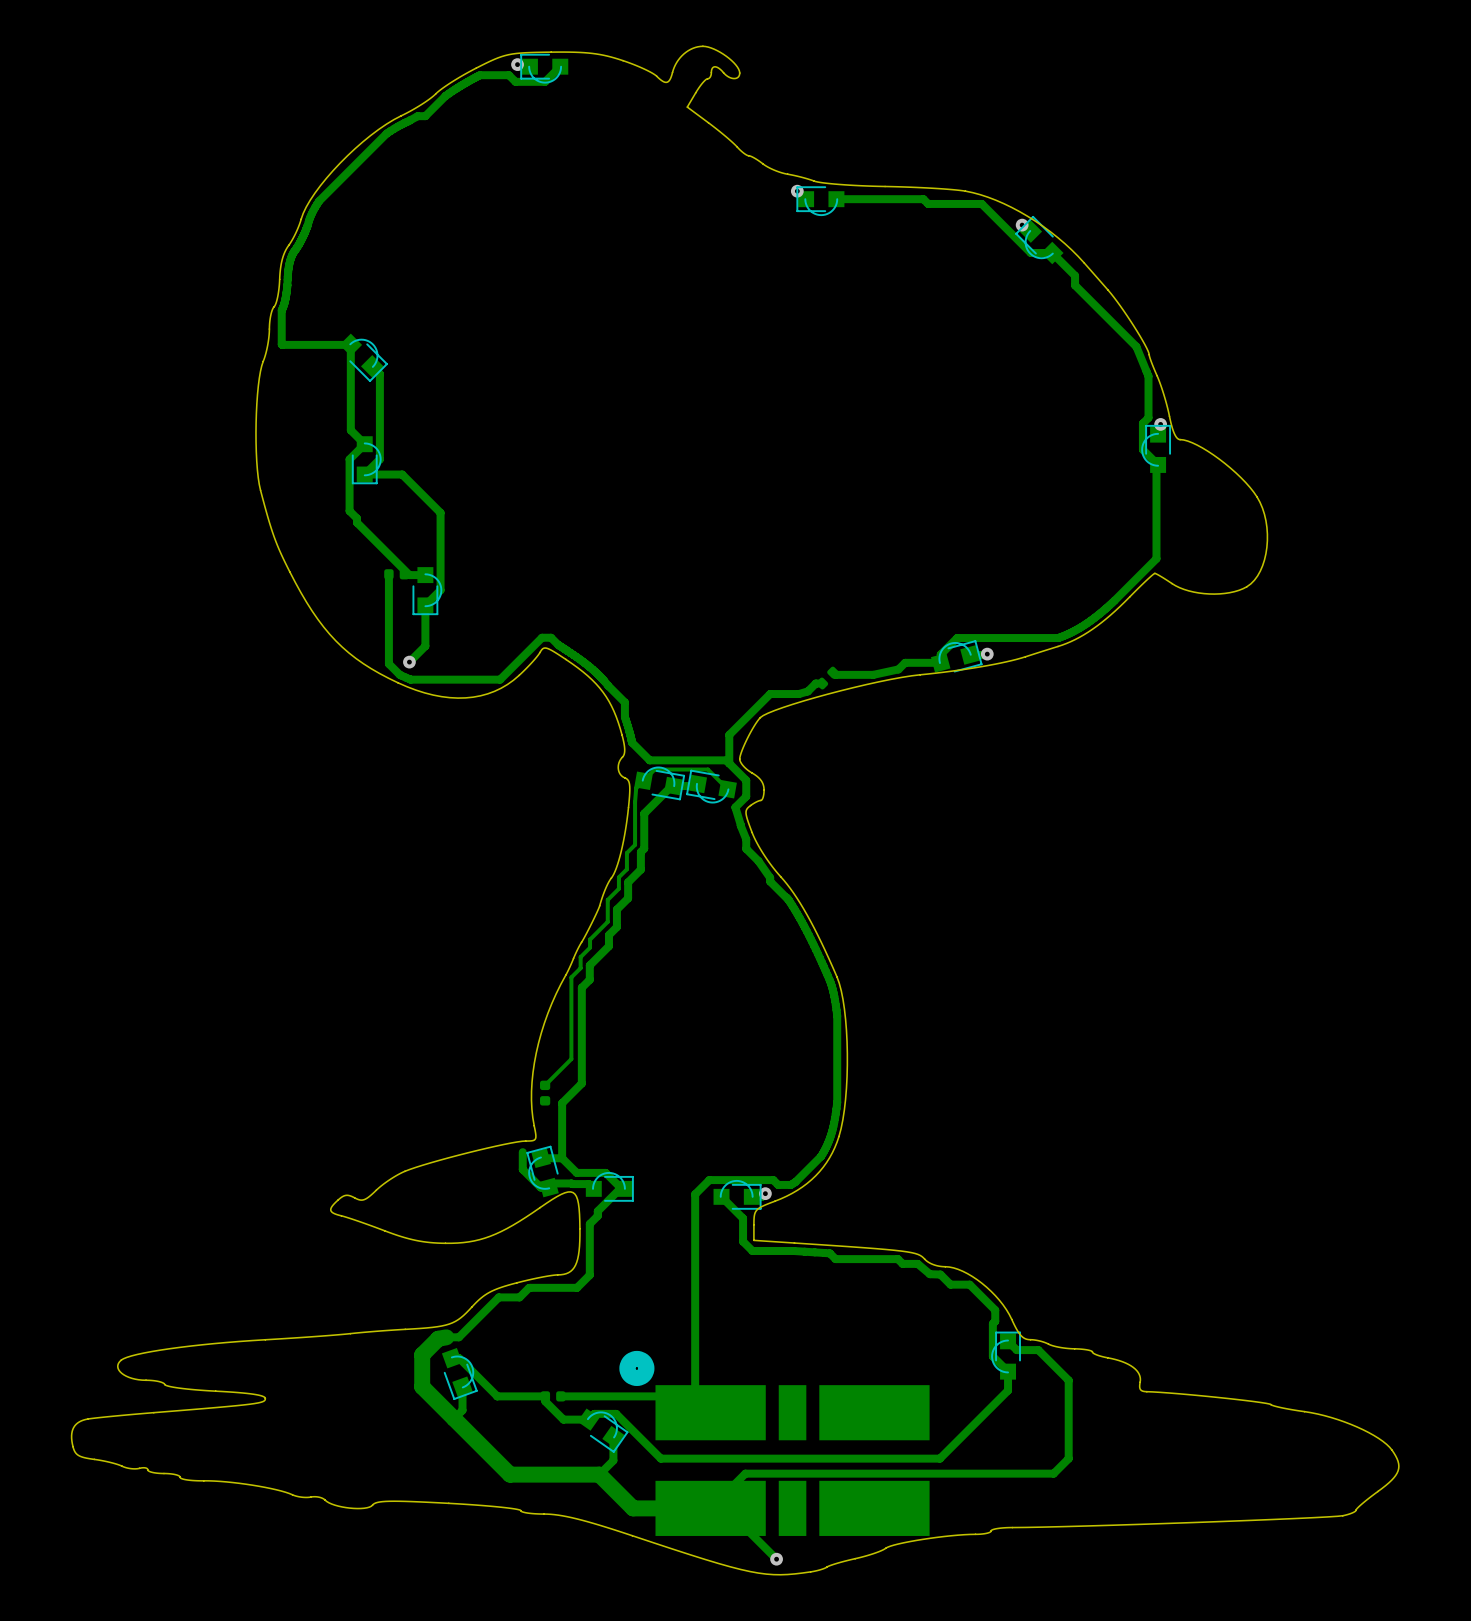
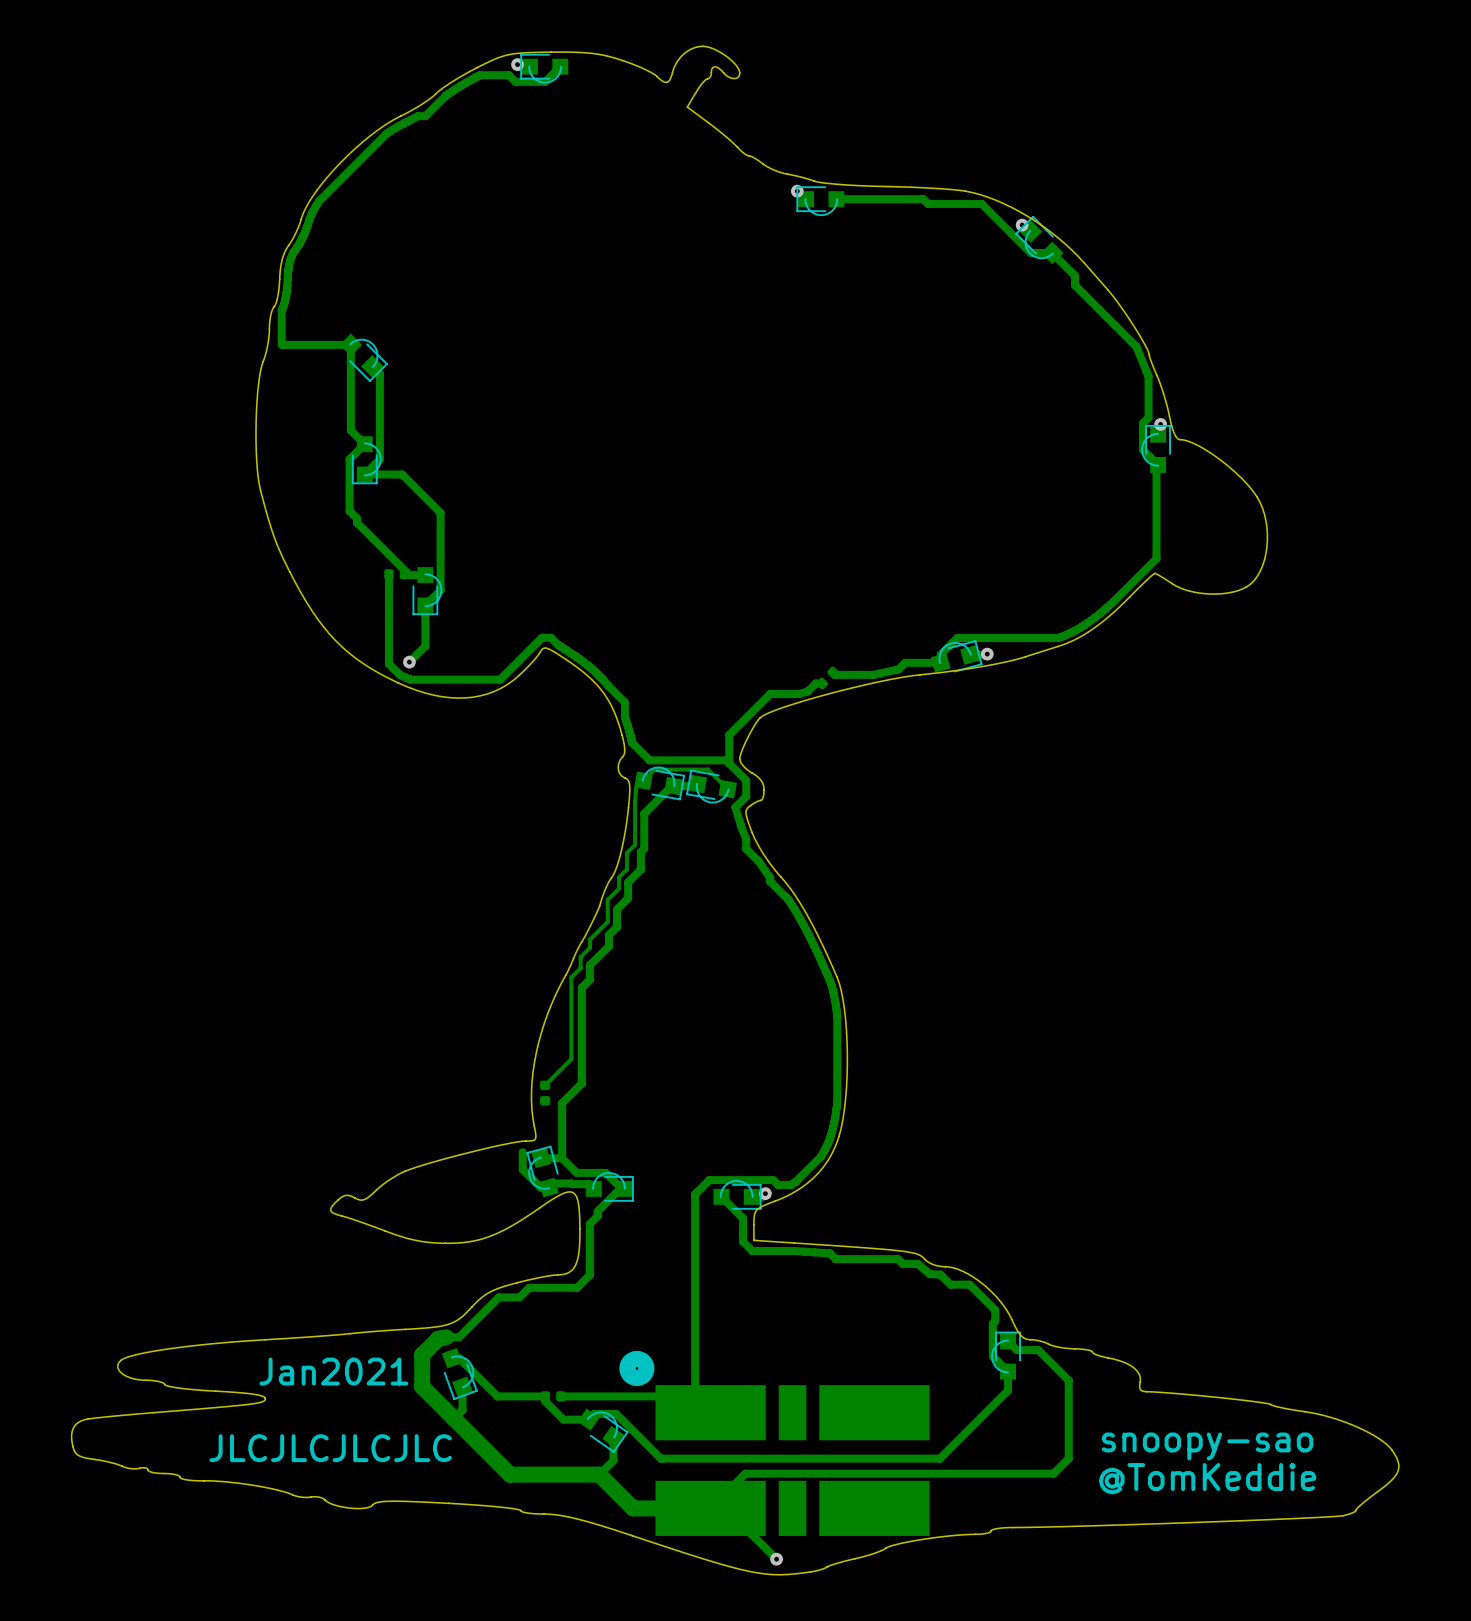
text: none -> Jan2021 (333, 1371)
text: none -> snoopy-sao (1207, 1446)
text: none -> JLCJLCJLCJLC (330, 1448)
text: none -> @TomKeddie (1207, 1478)

